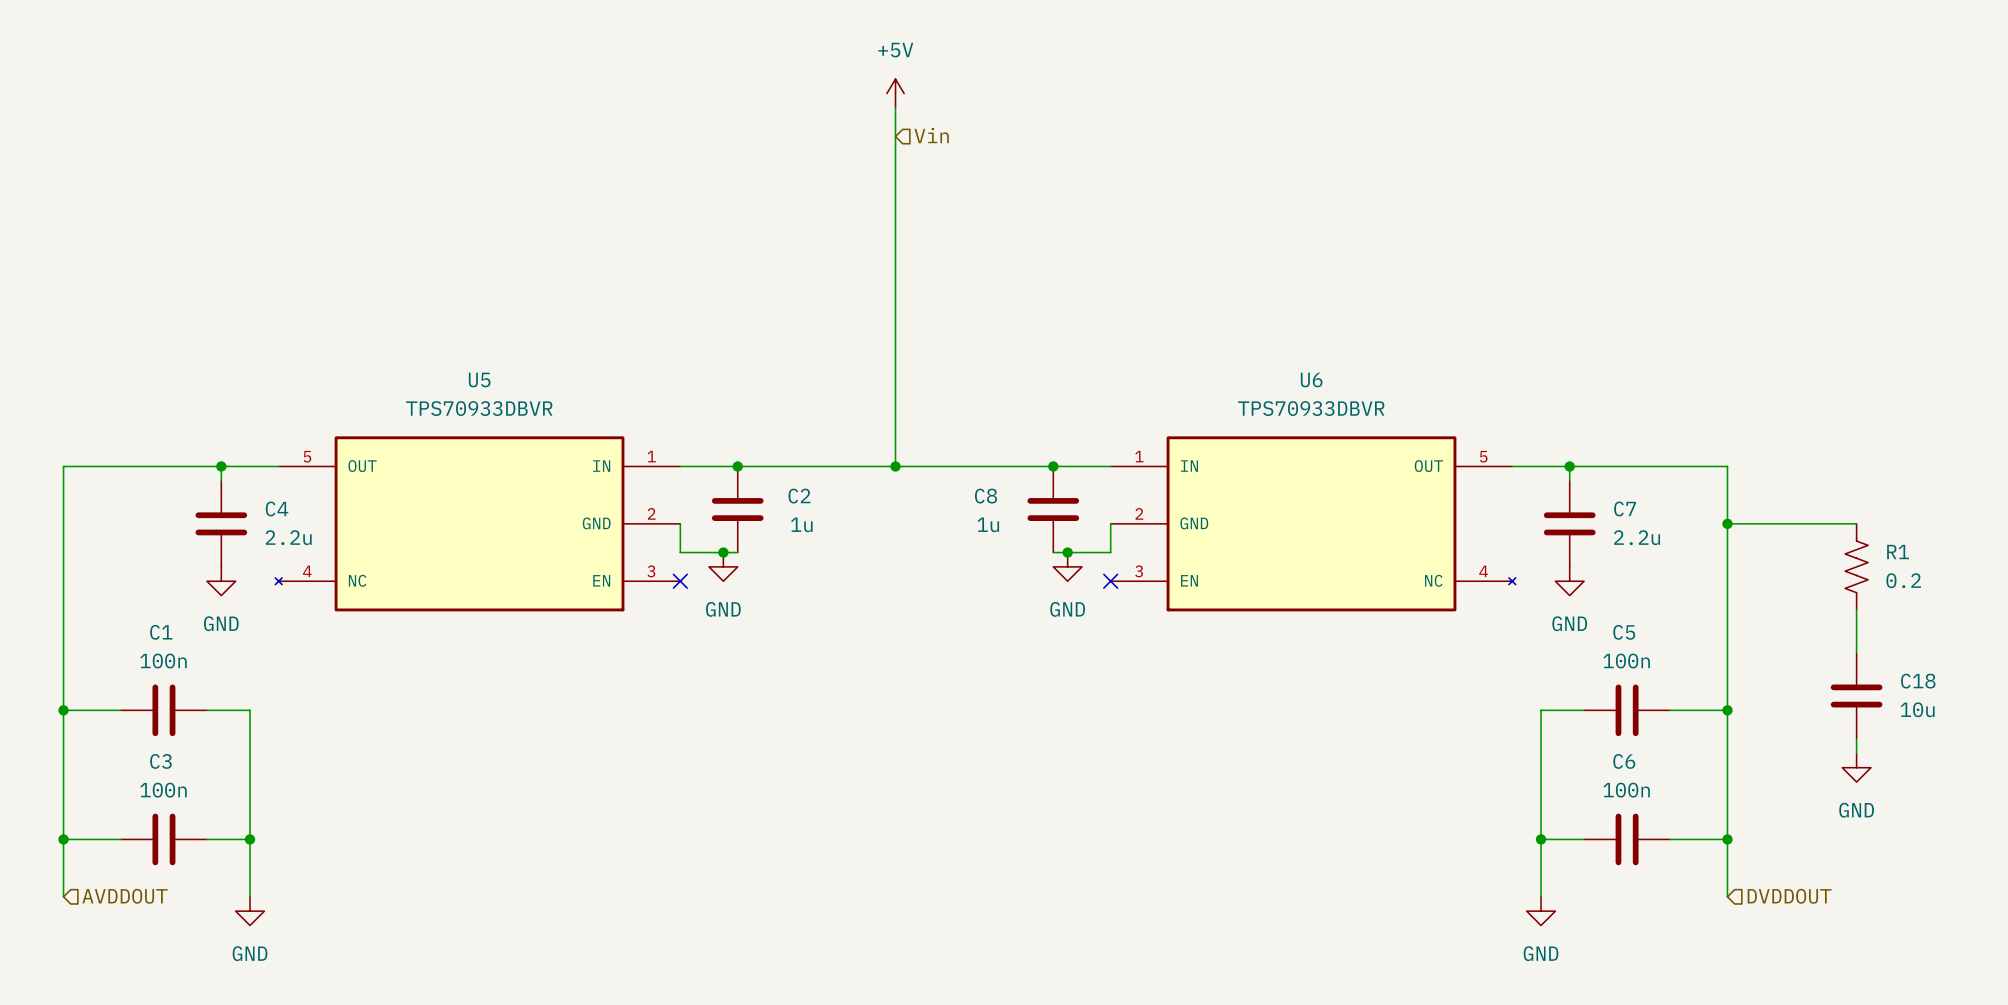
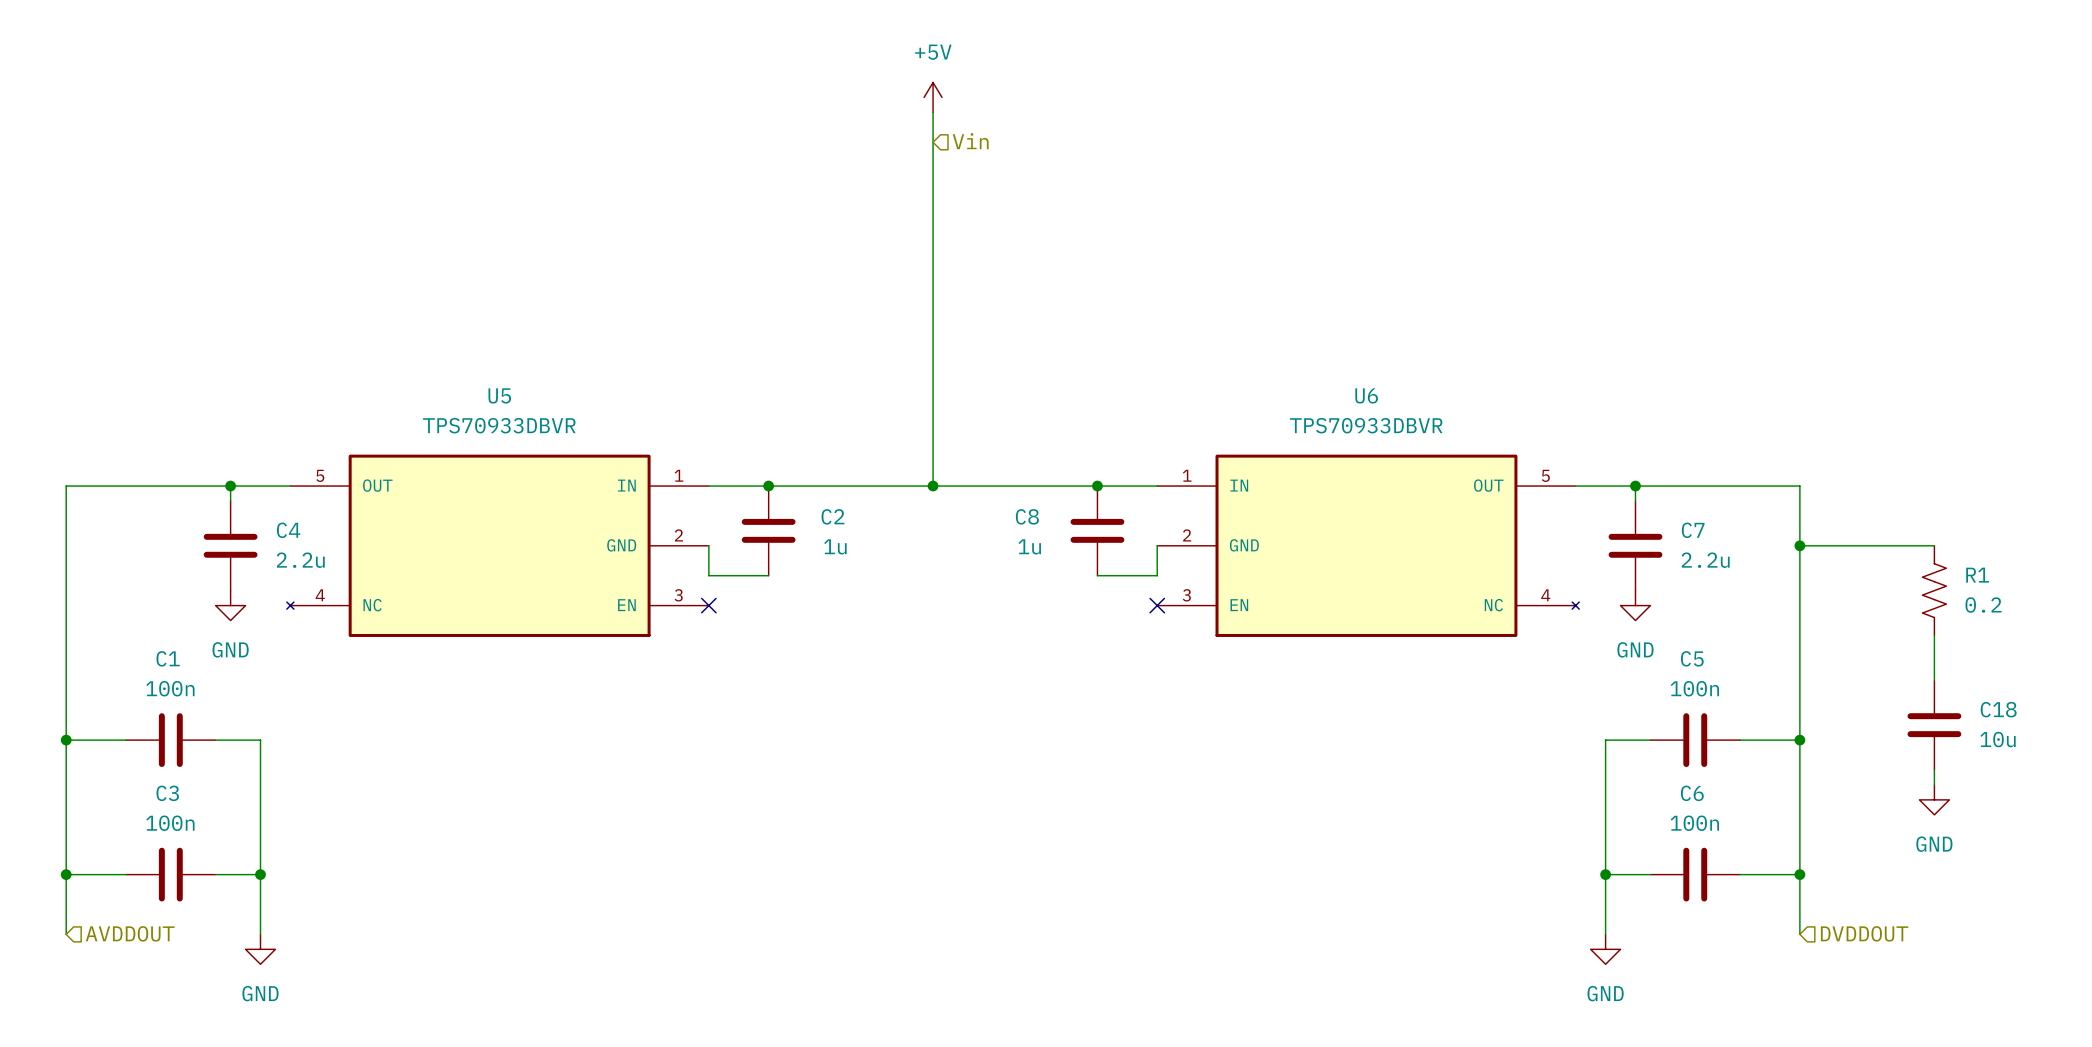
junction: (723, 552) -> none
junction: (1067, 552) -> none
power symbol: GND (723, 566) -> none
power symbol: GND (1067, 566) -> none

